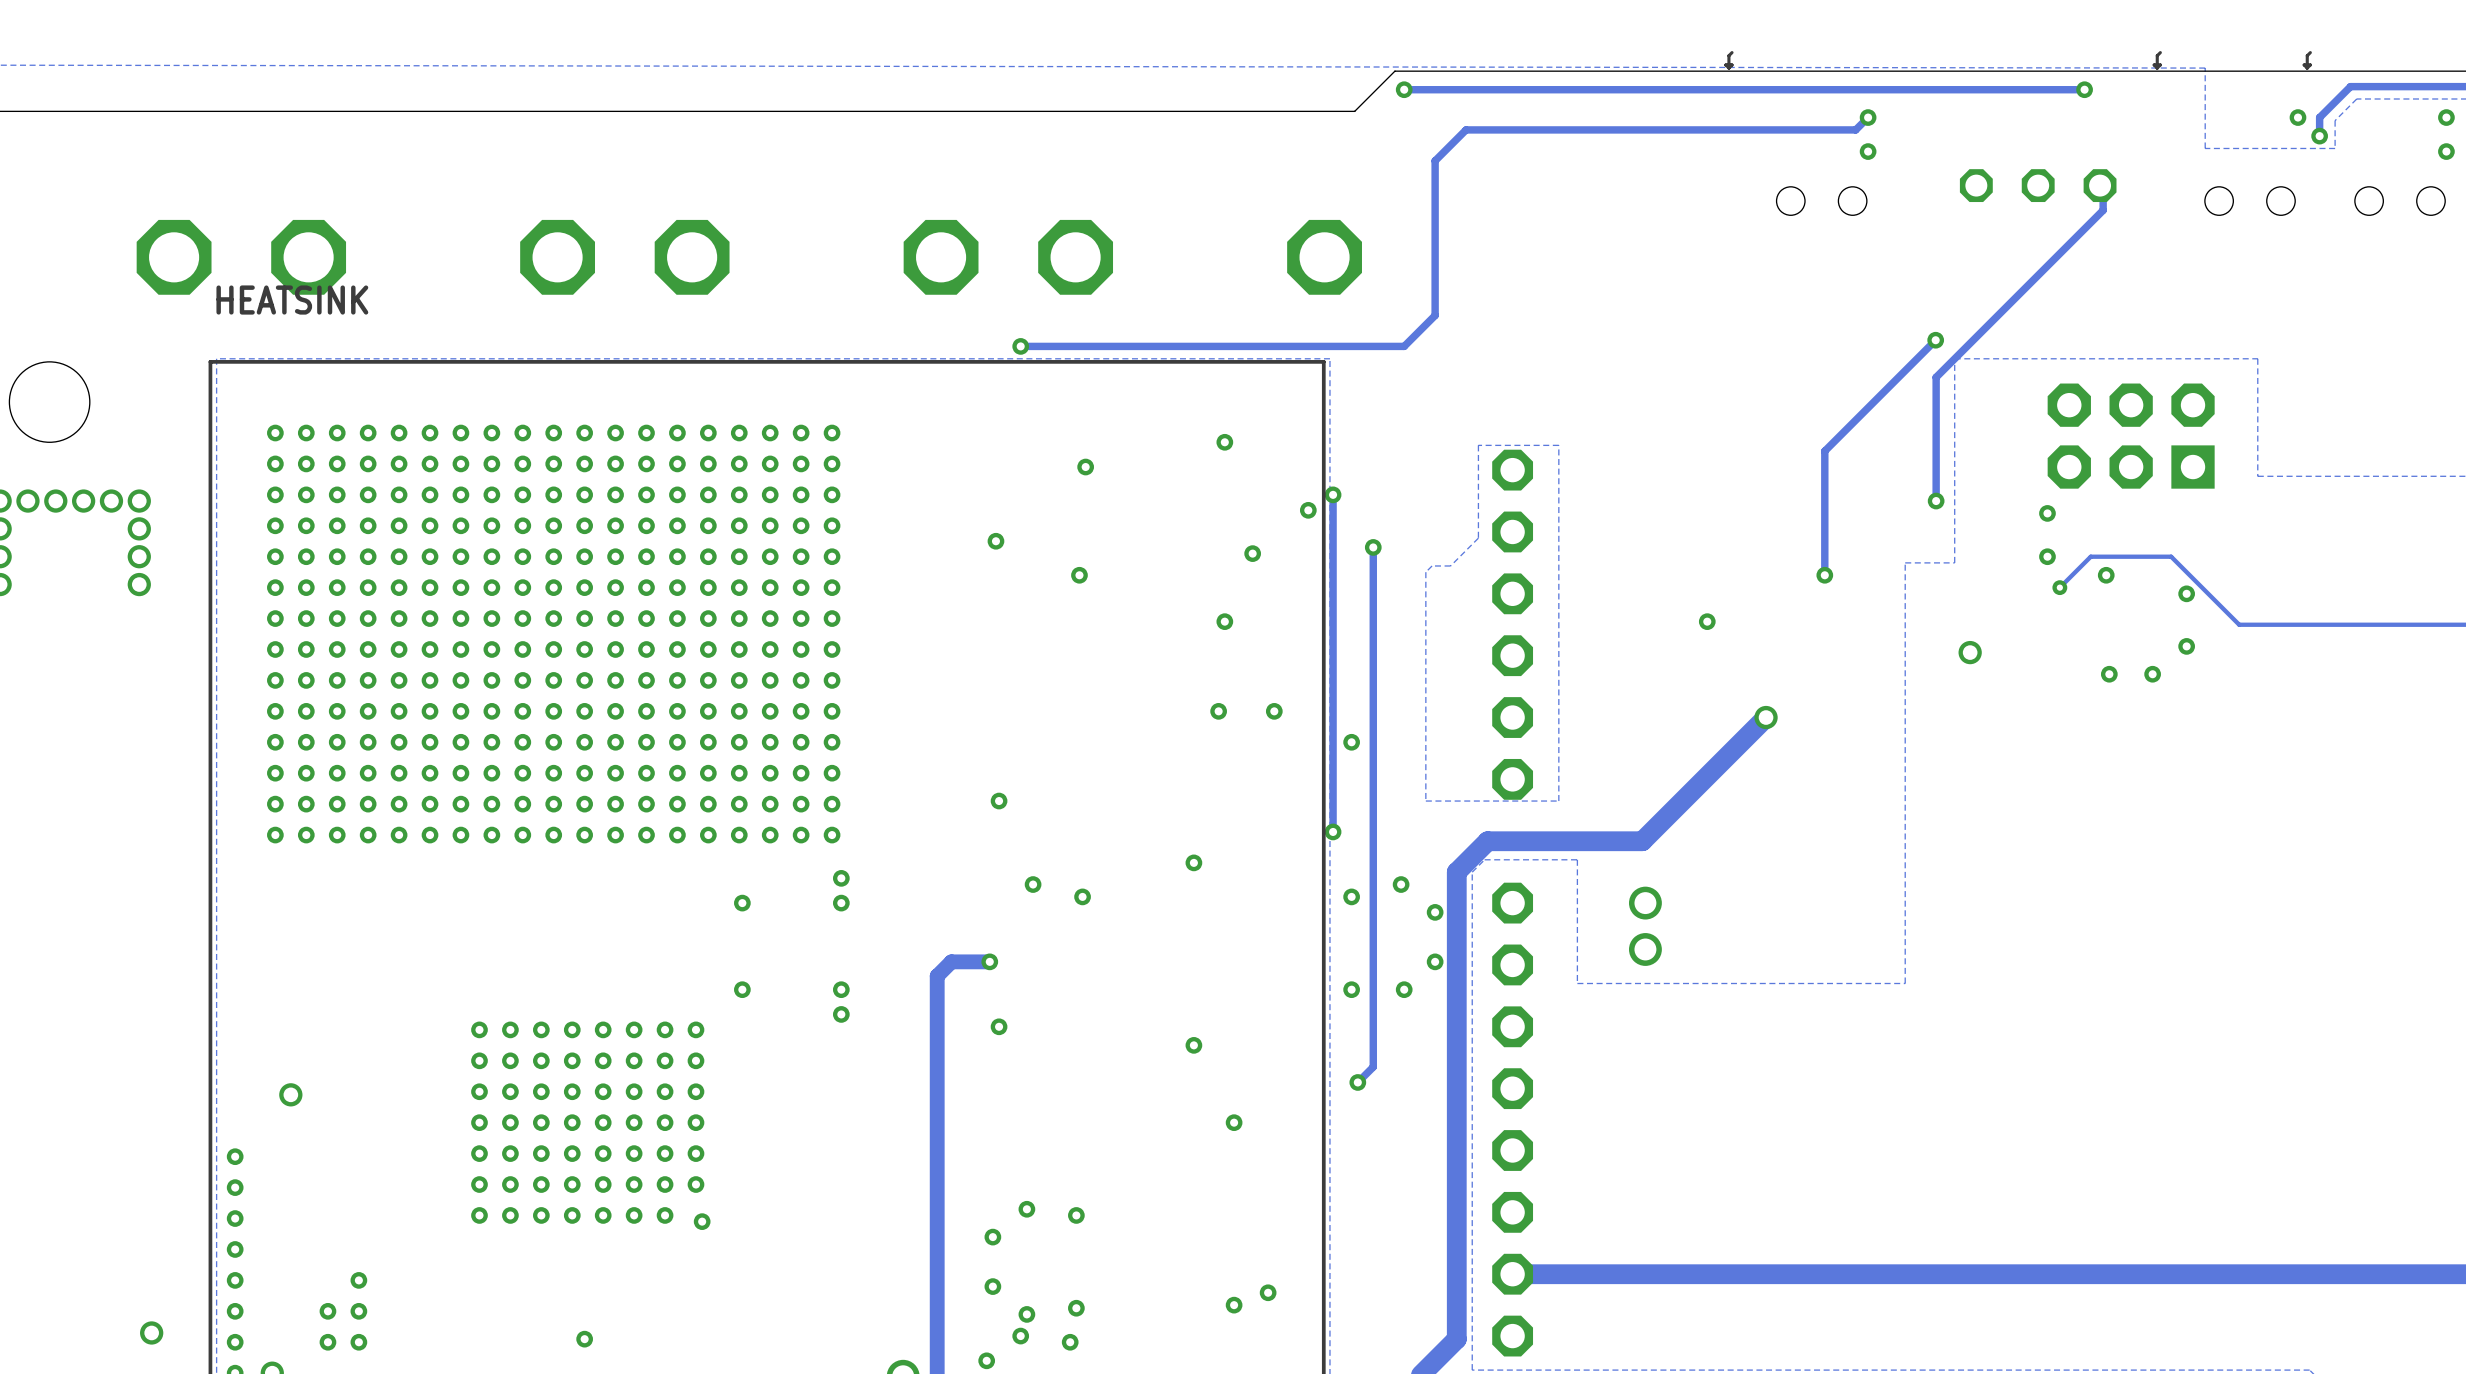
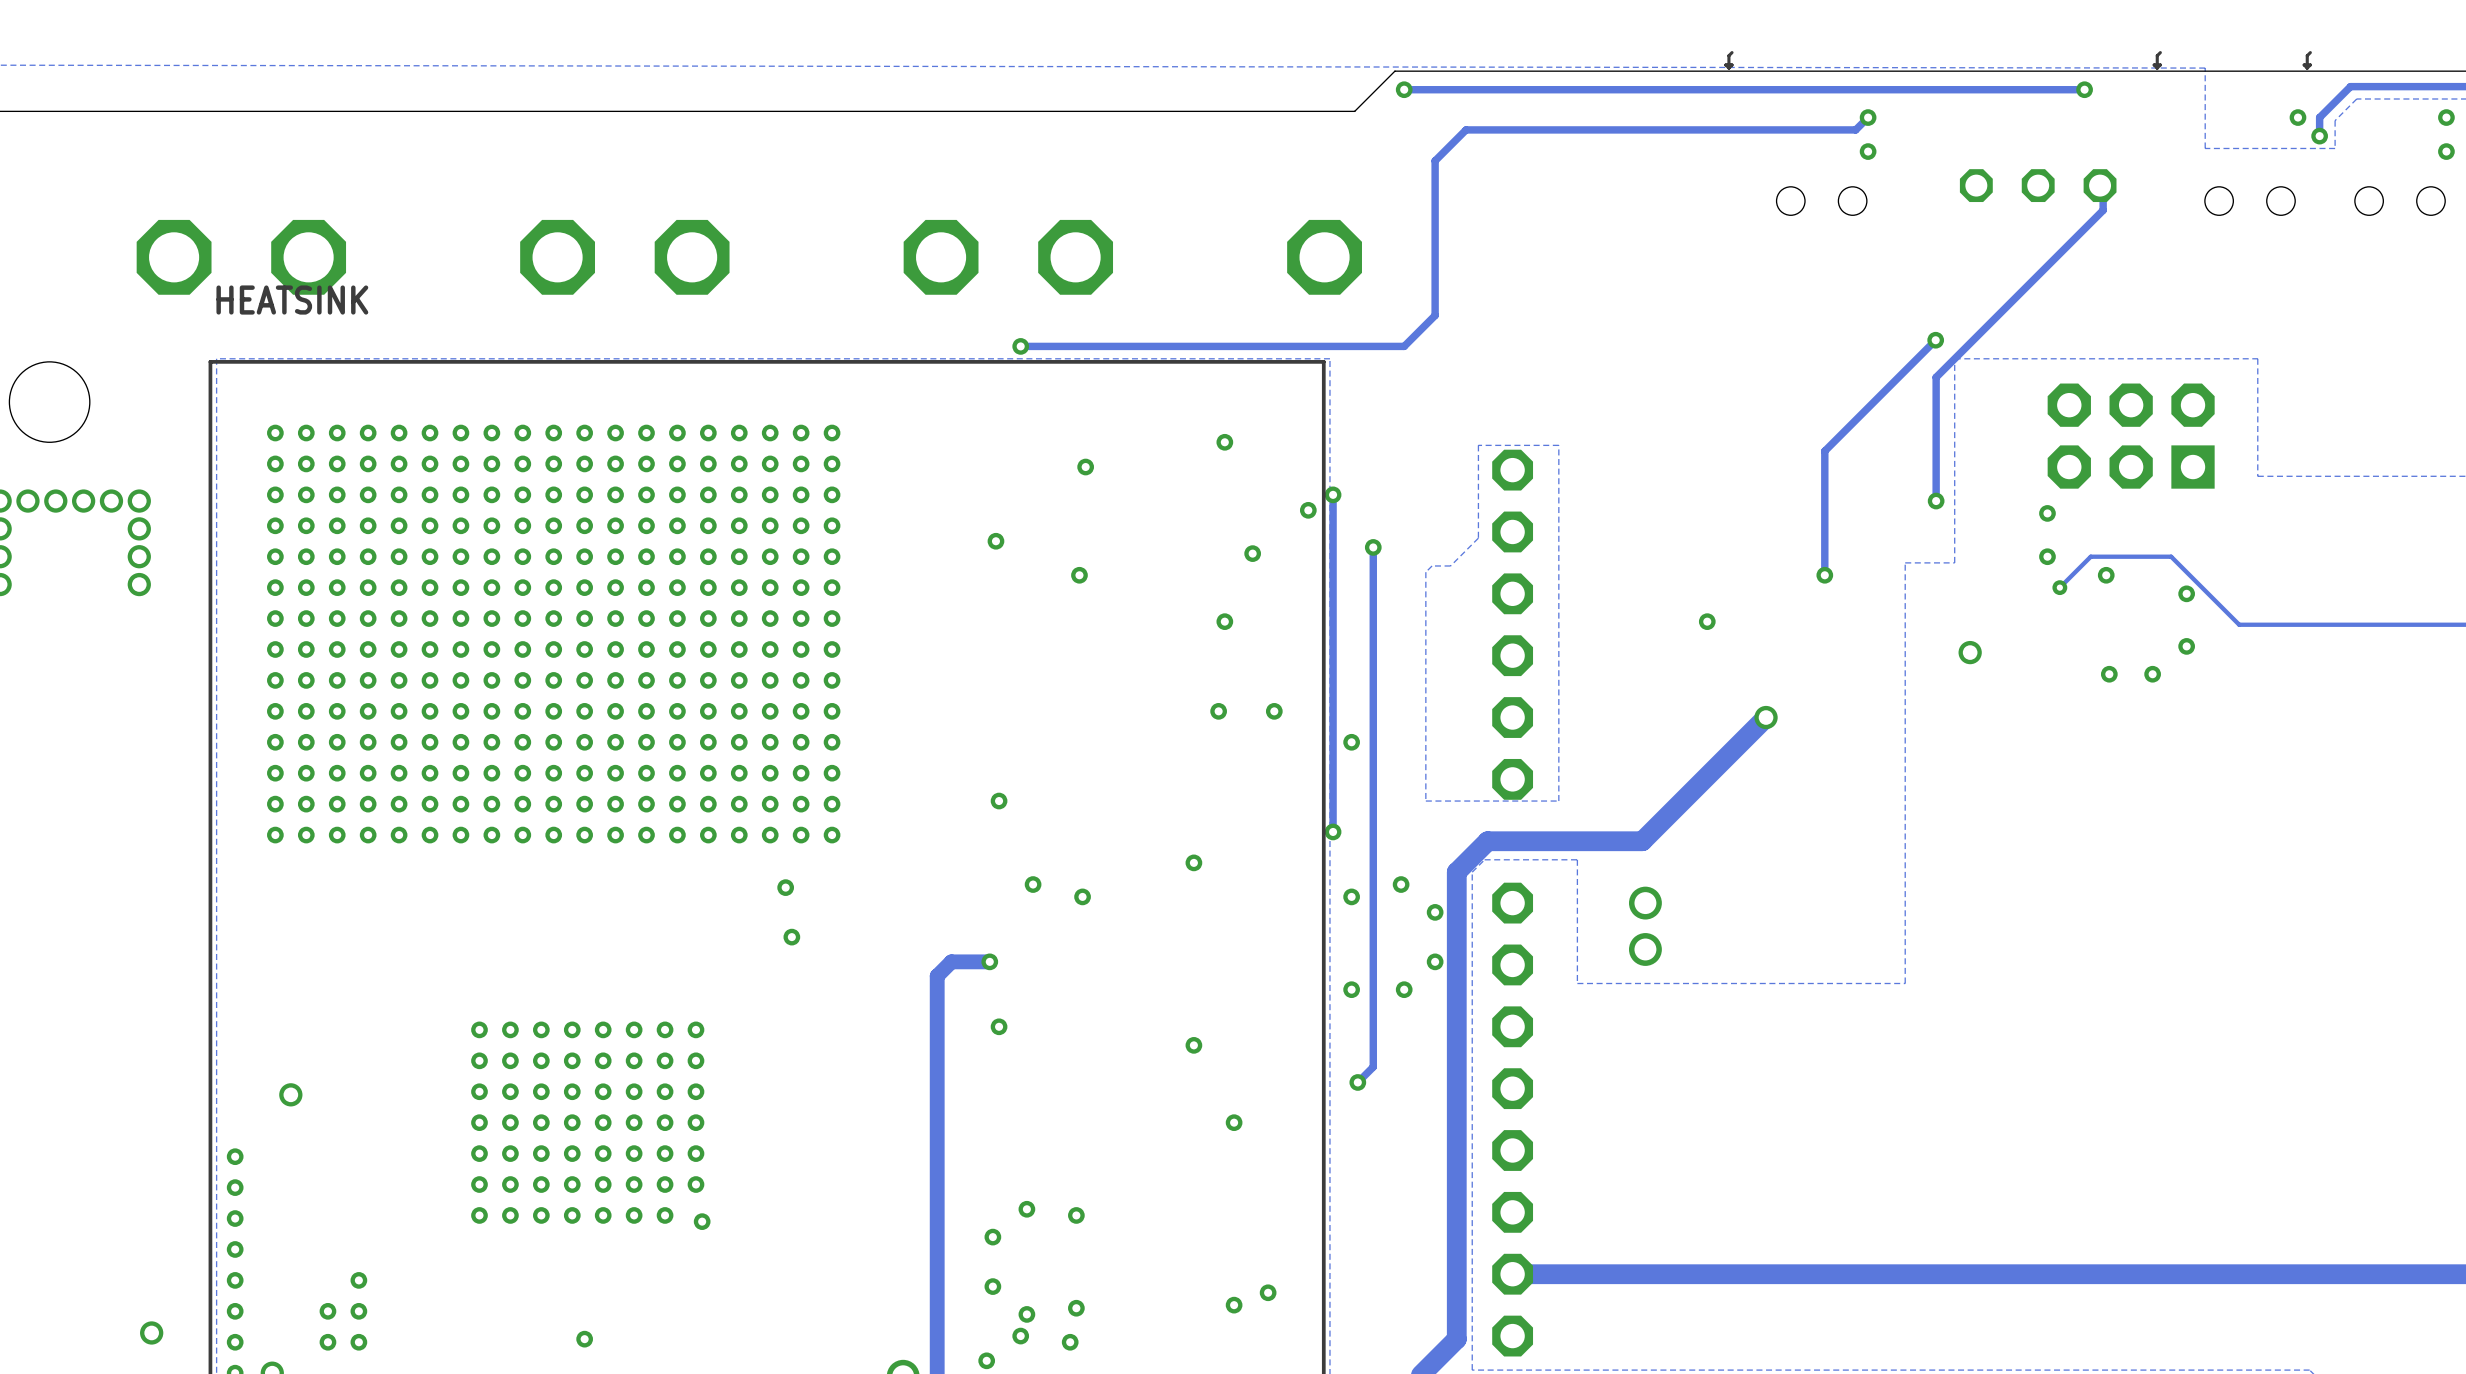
via: (841, 878) -> none
via: none -> (785, 887)
via: (742, 903) -> none
via: (841, 903) -> none
via: none -> (791, 937)
via: (742, 989) -> none
via: (841, 989) -> none
via: (841, 1014) -> none

